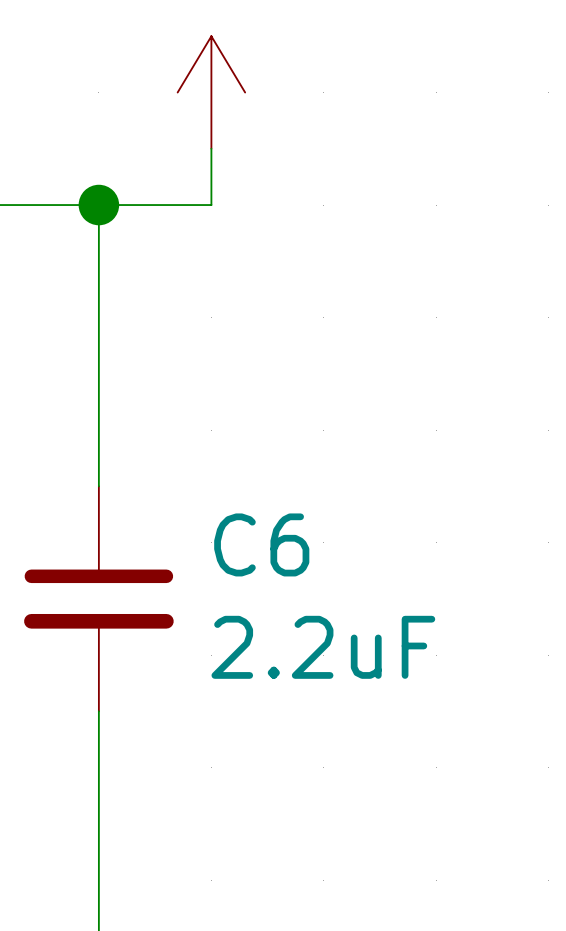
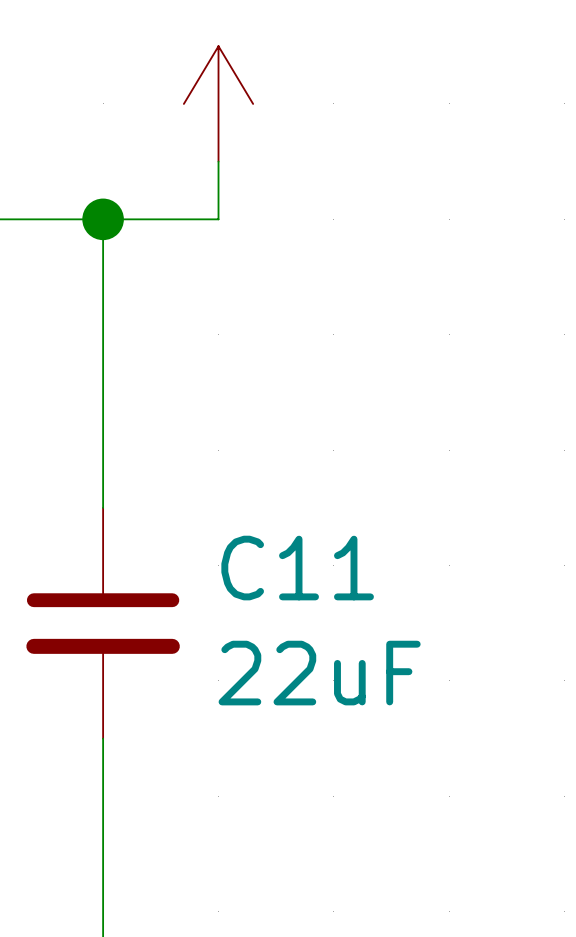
C6 name: C6 (261, 544) -> C11 (297, 568)
C6 value: 2.2uF (323, 647) -> 22uF (319, 673)

